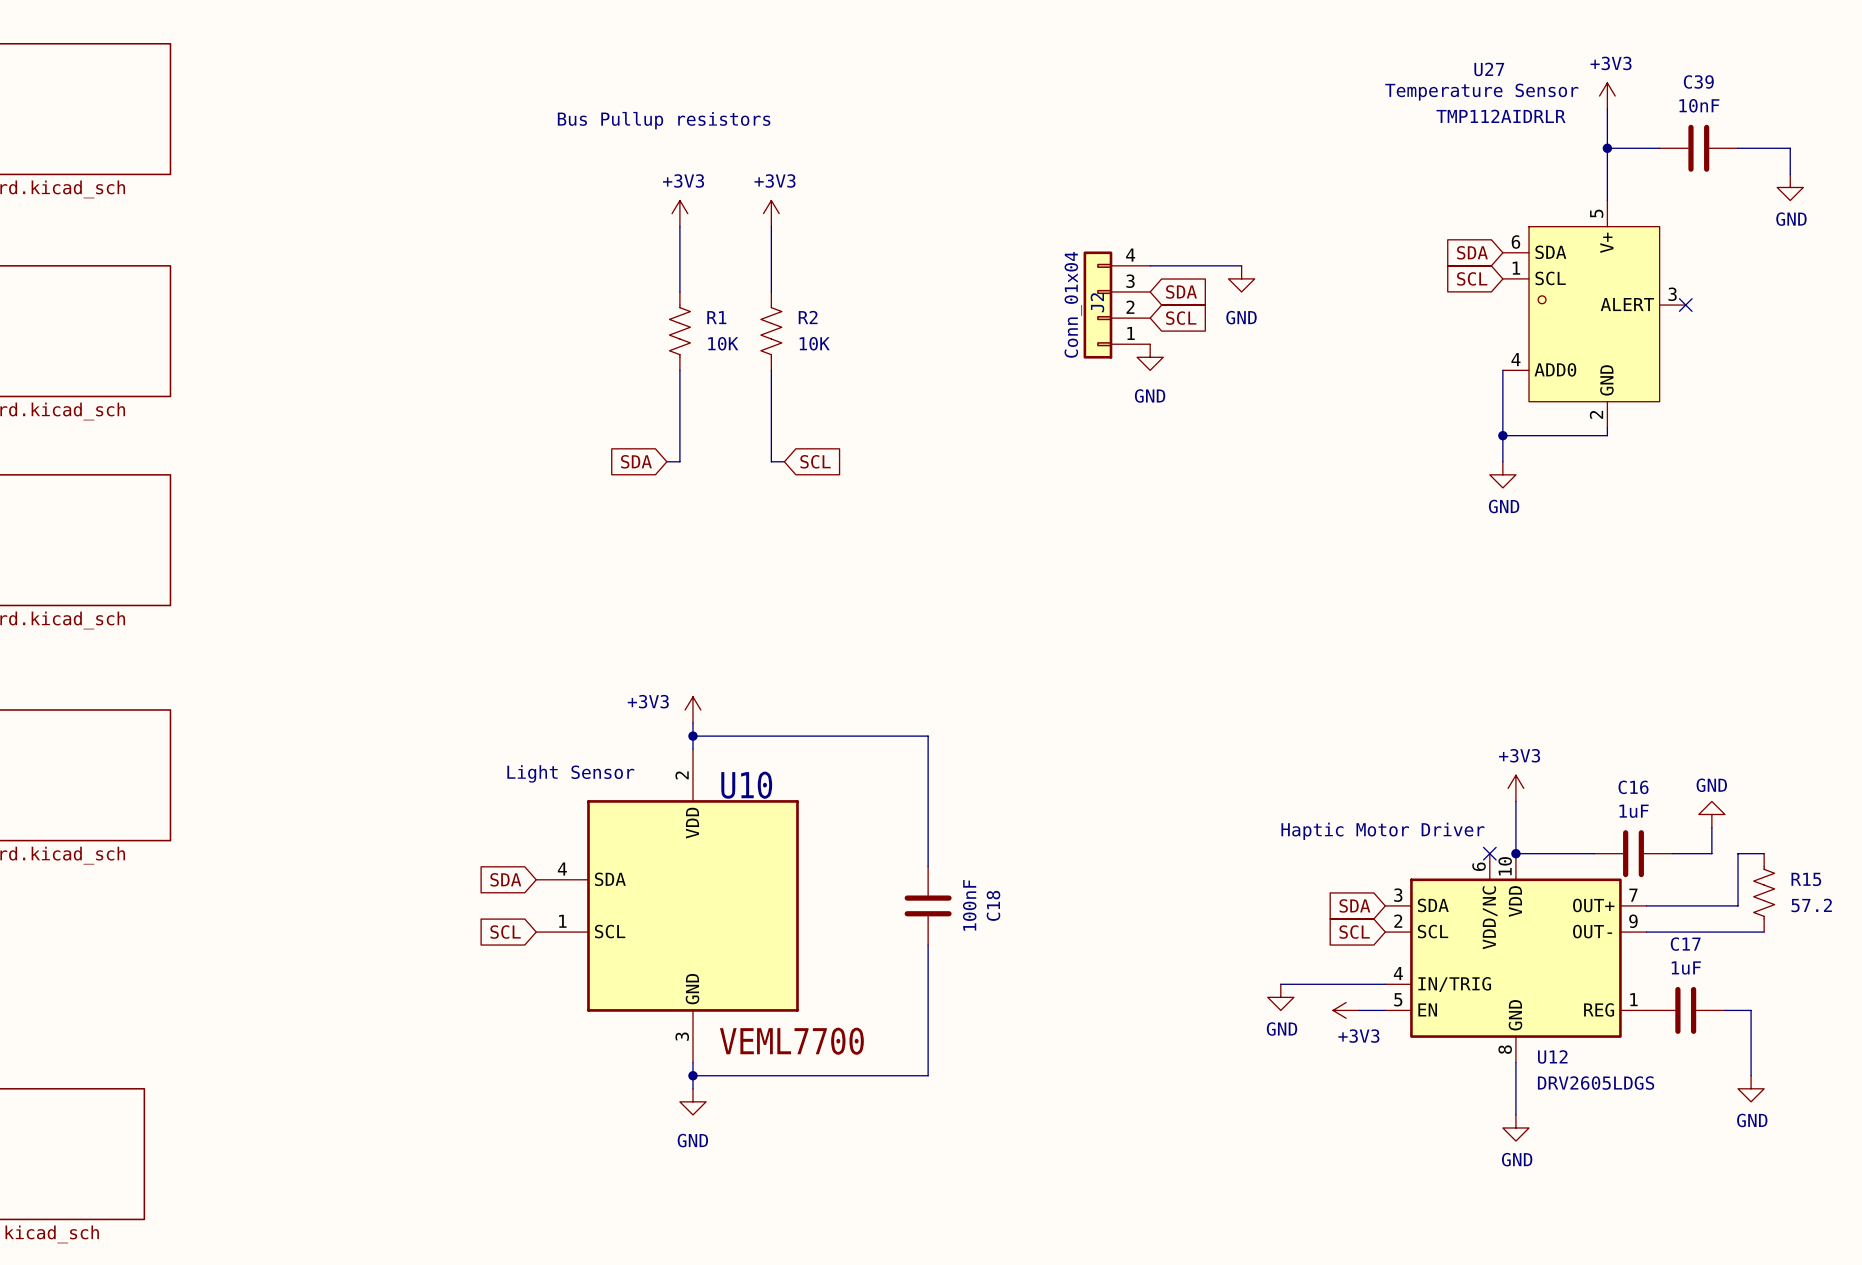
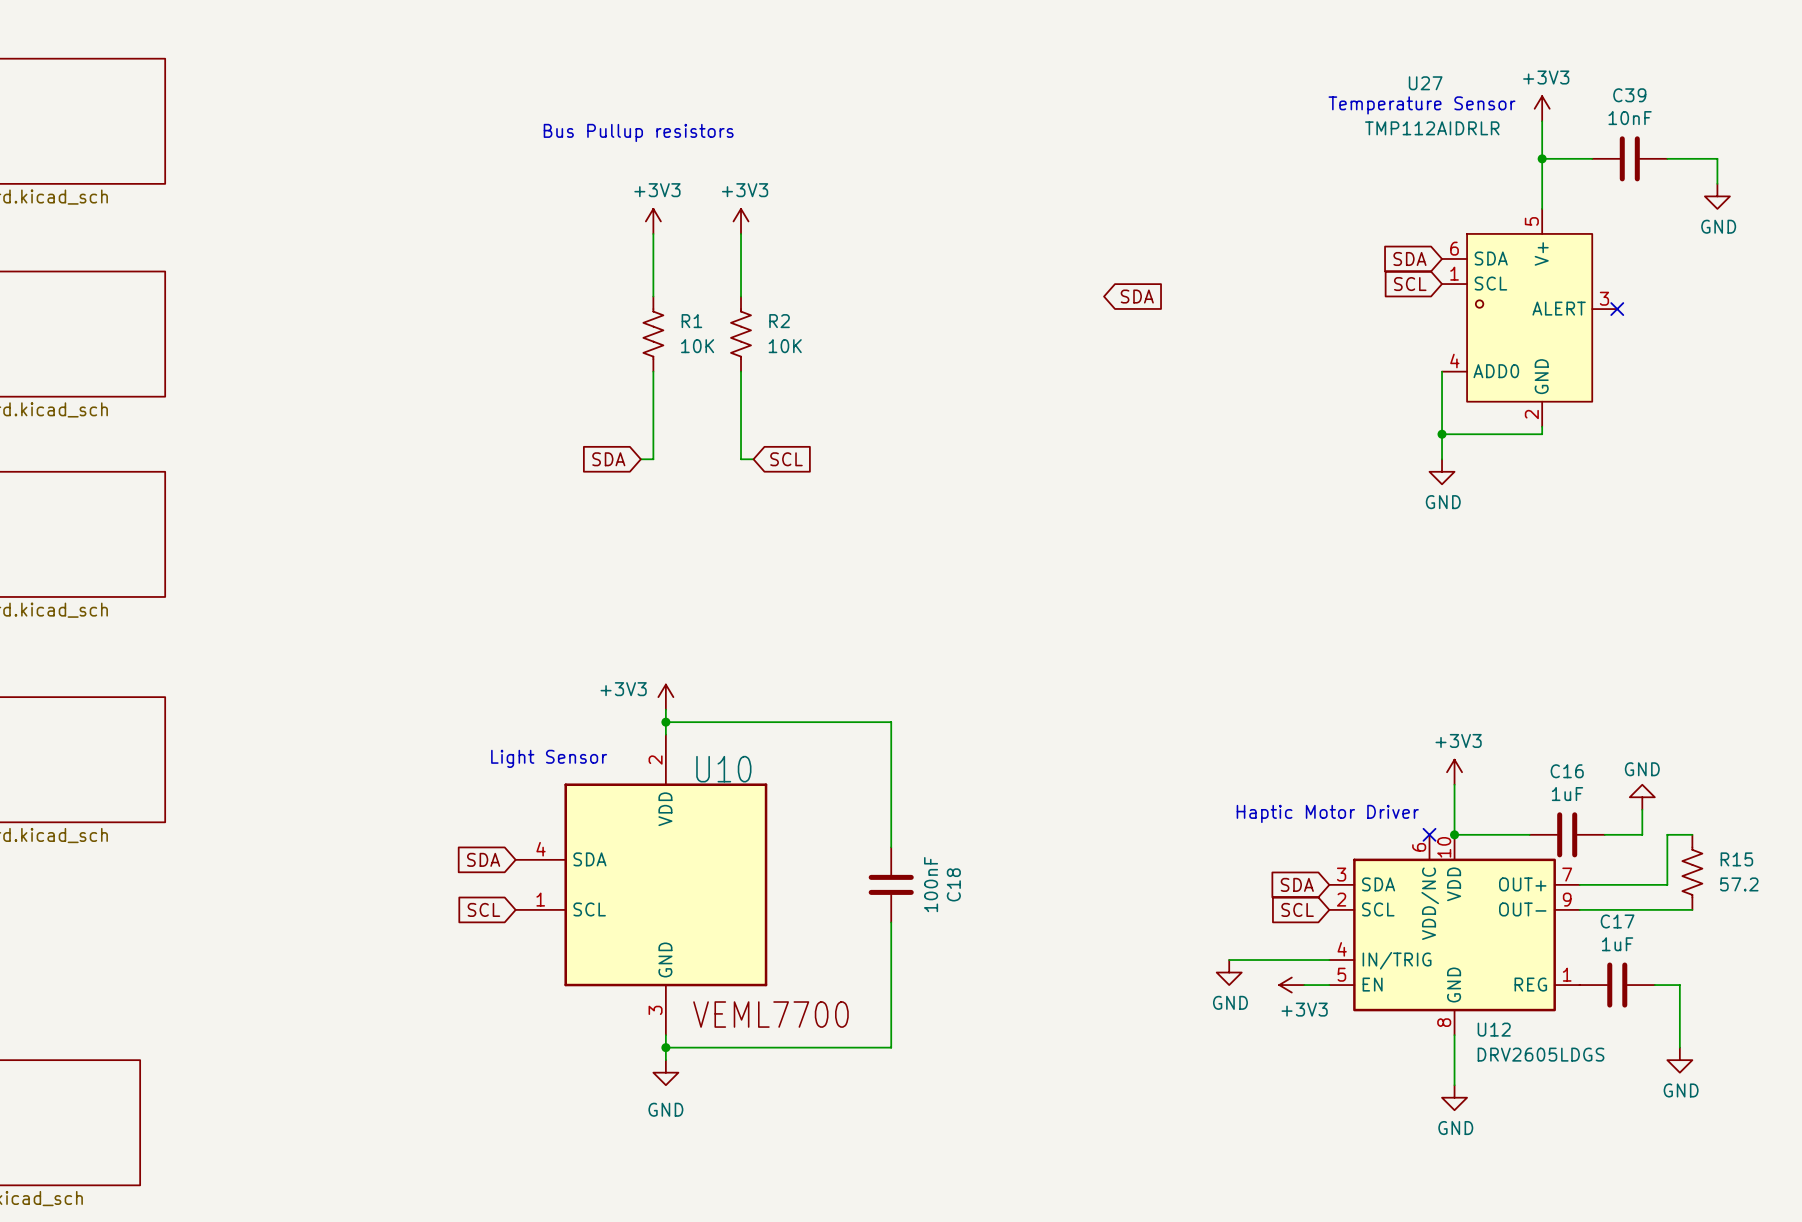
wire: (1150, 265) (1241, 265) -> none
power symbol: GND (1241, 278) -> none
J2: Conn_01x04 (1116, 305) -> none
global label: SCL (1181, 318) -> none
power symbol: GND (1150, 357) -> none

